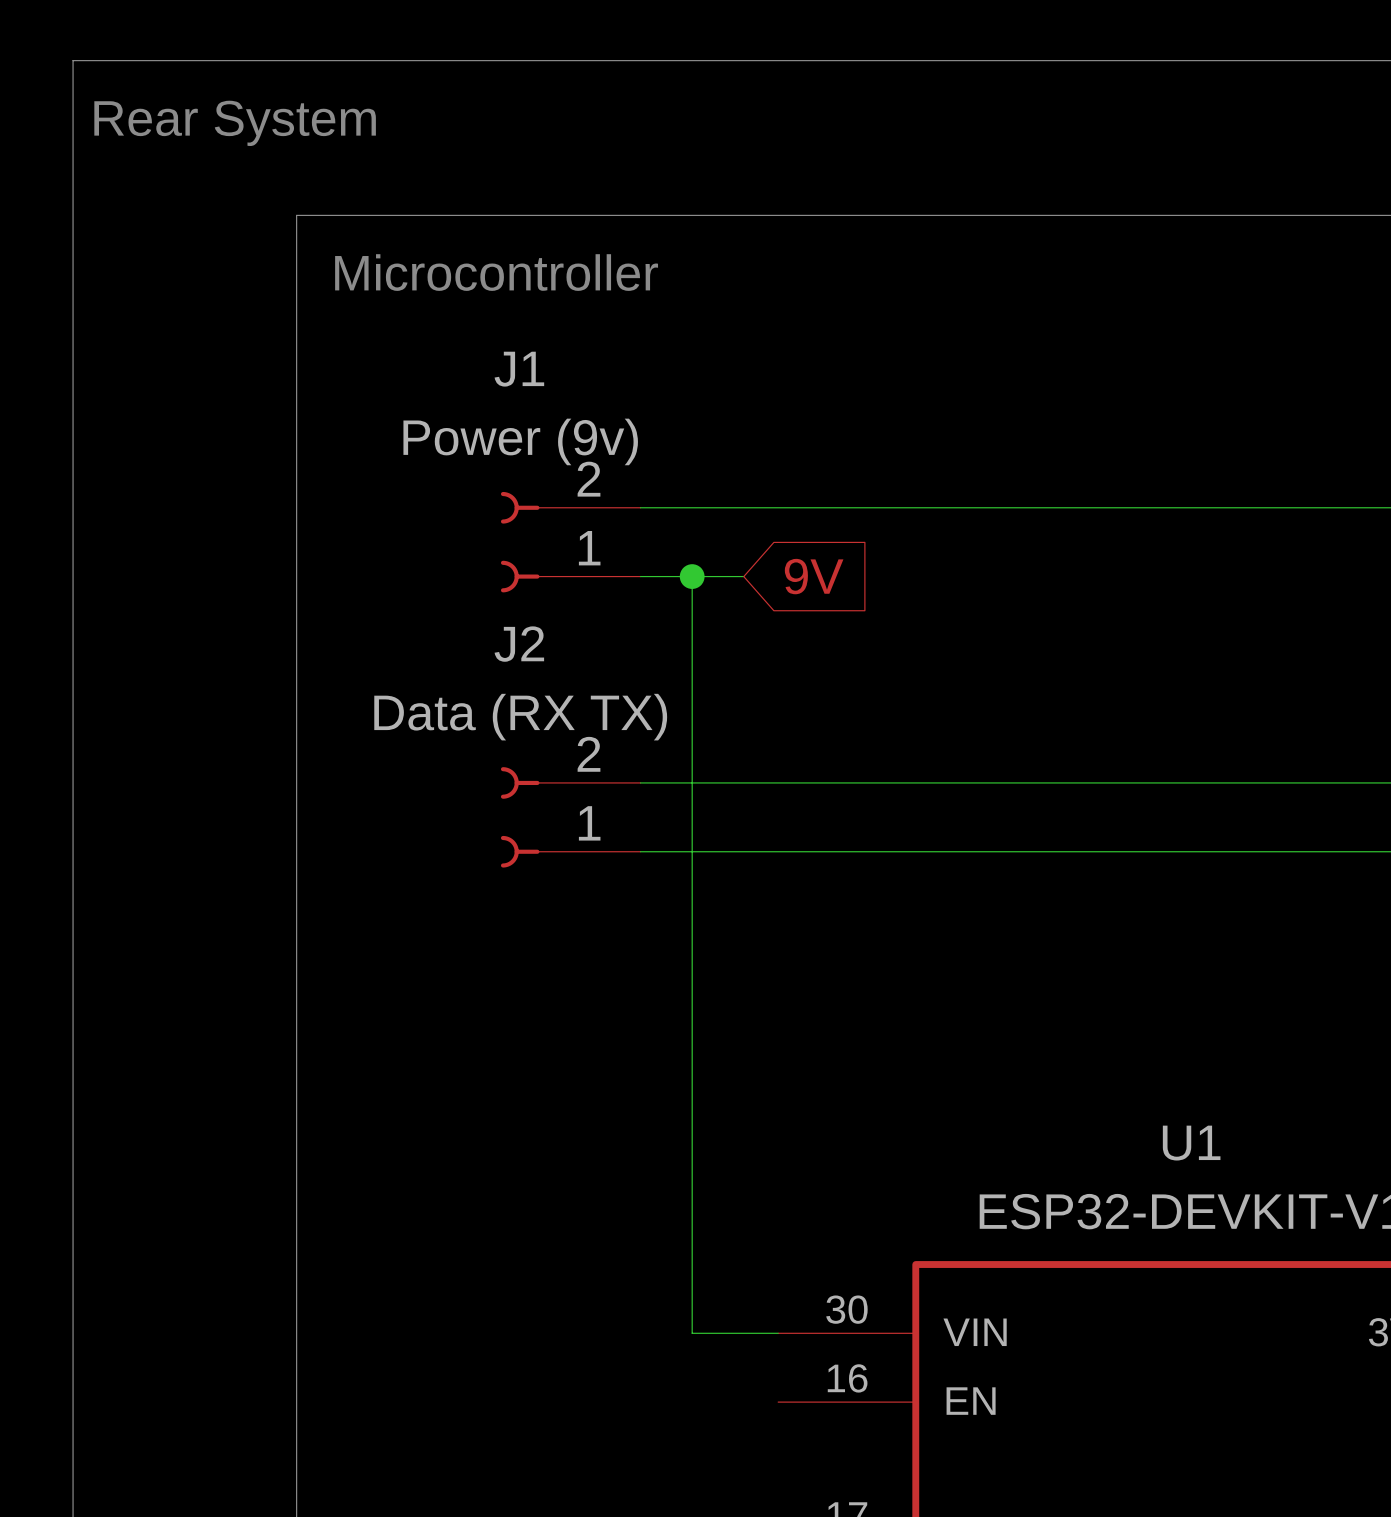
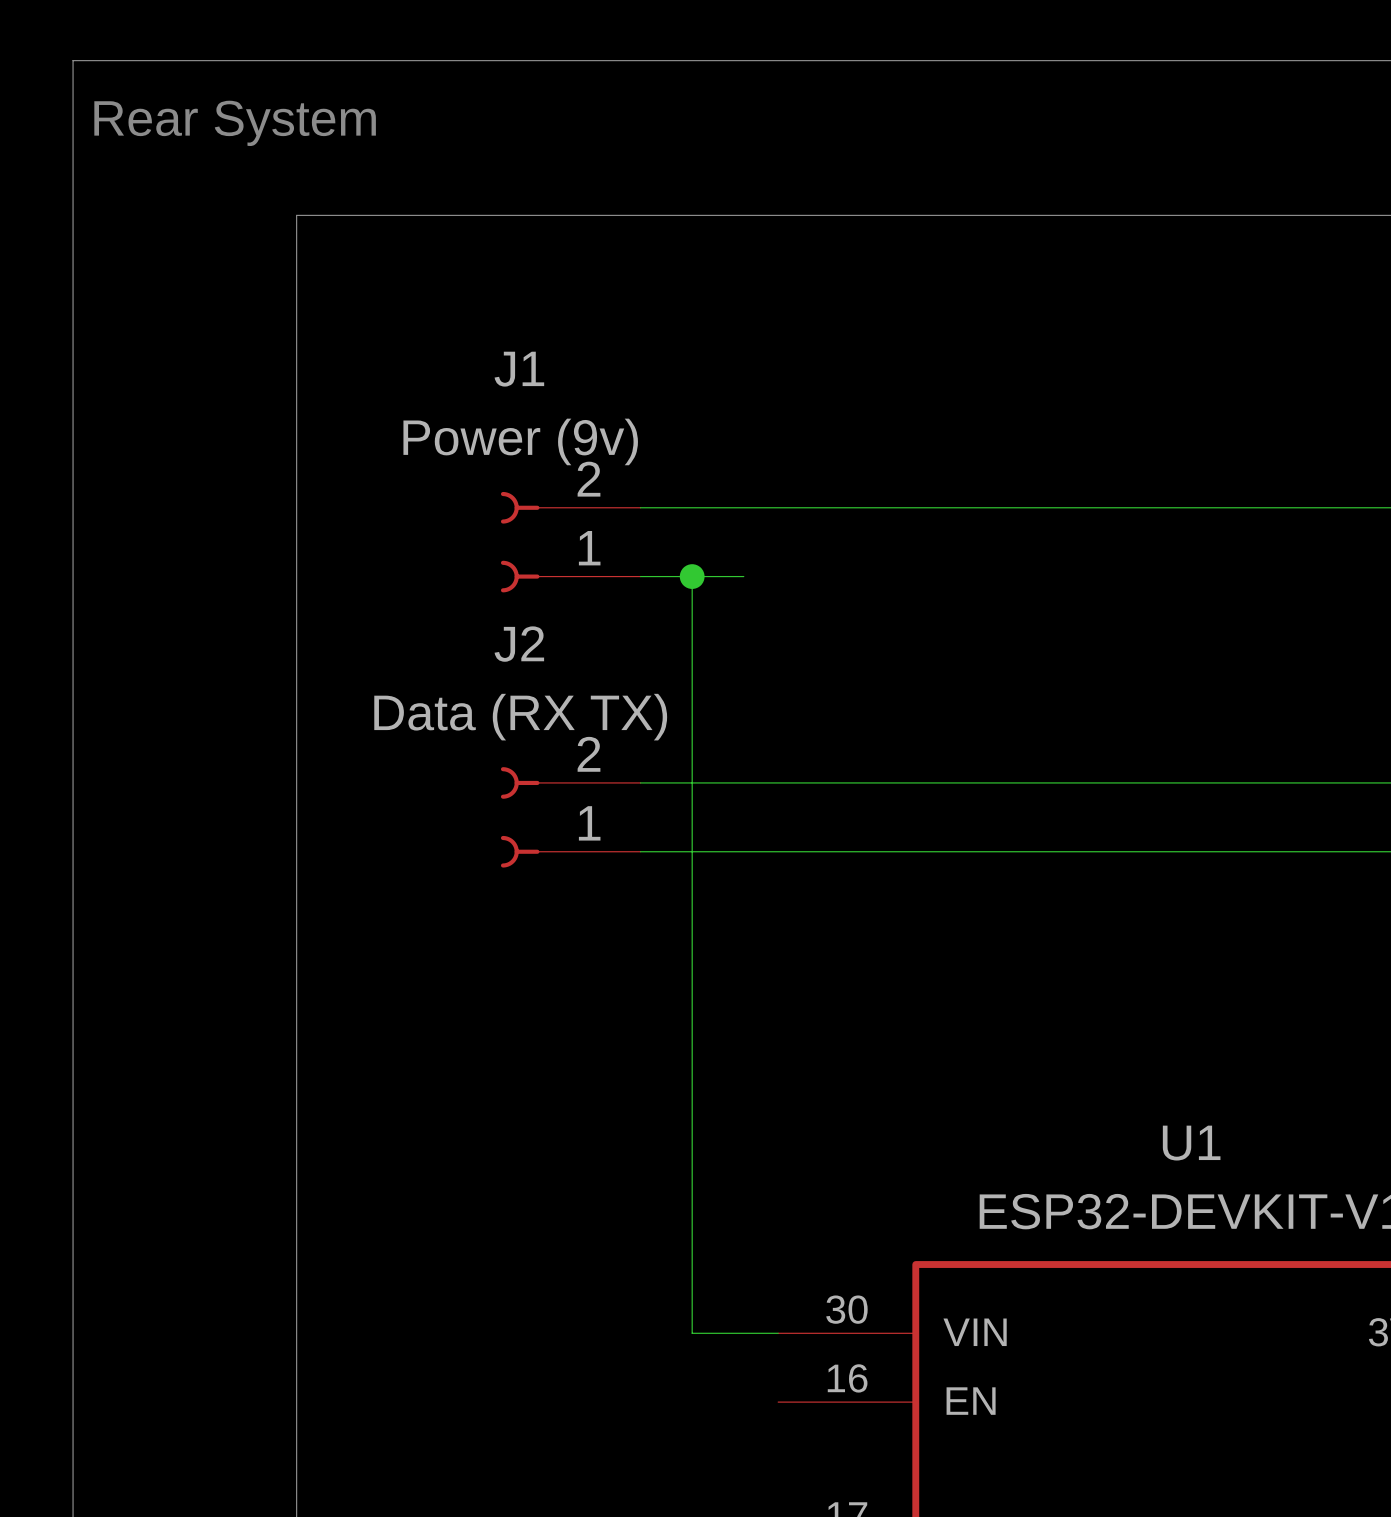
text: Microcontroller (496, 272) -> none
global label: 9V (814, 576) -> none

